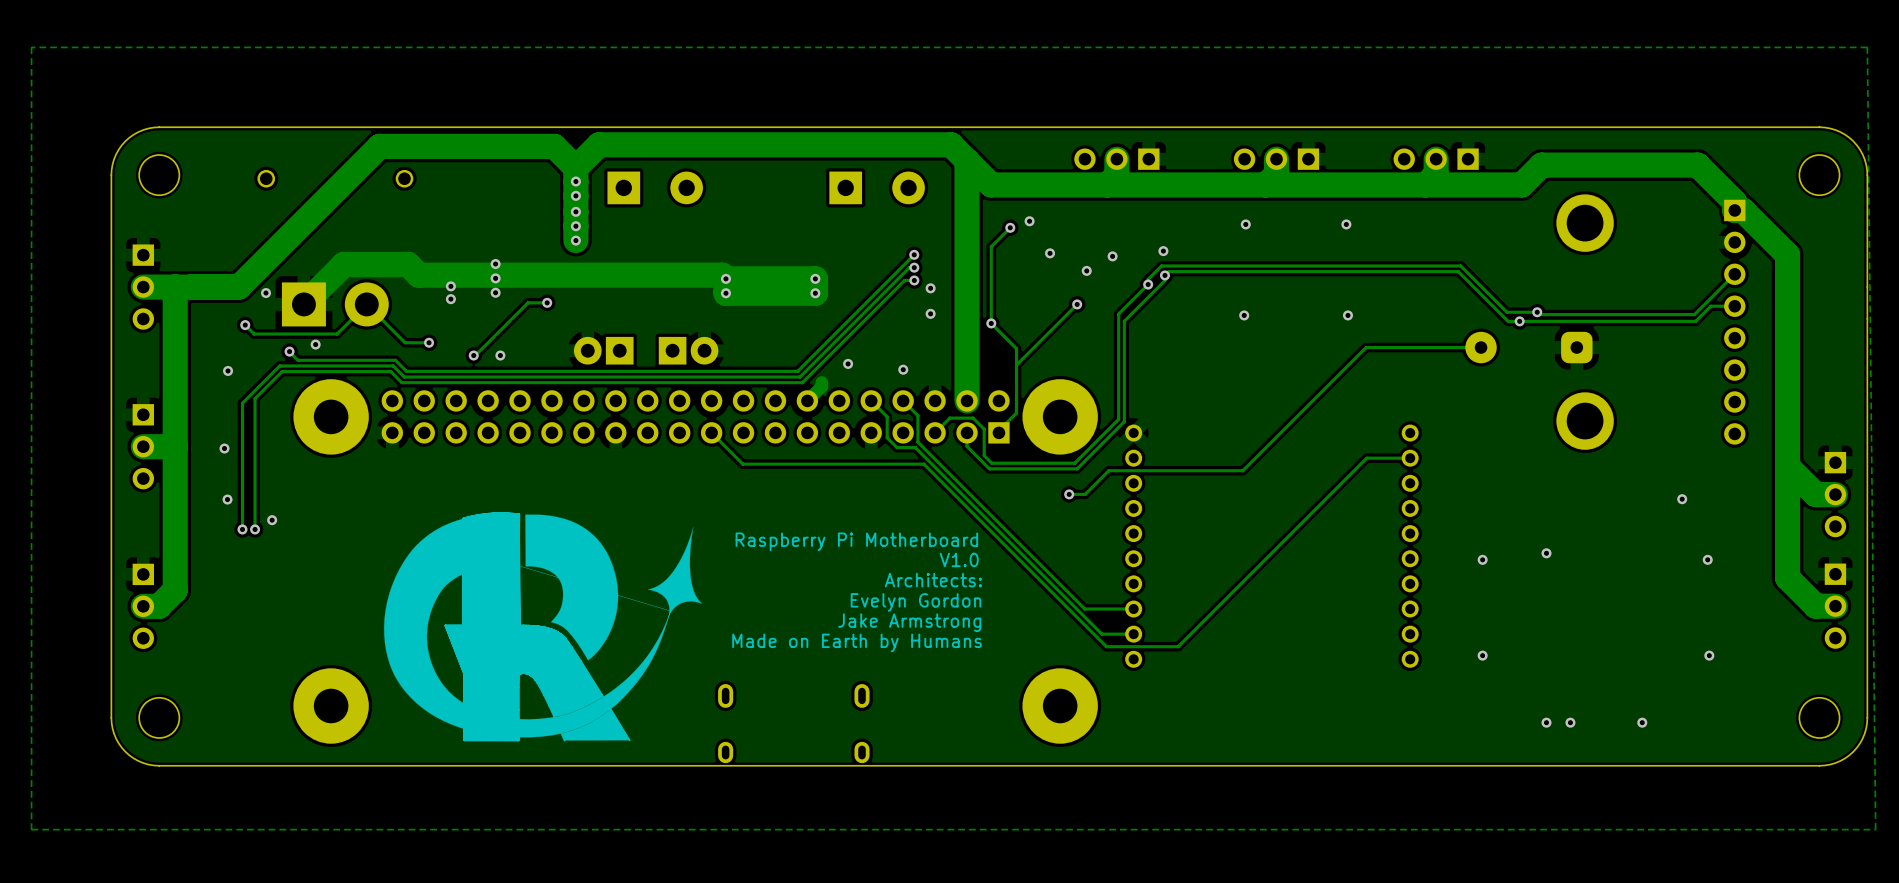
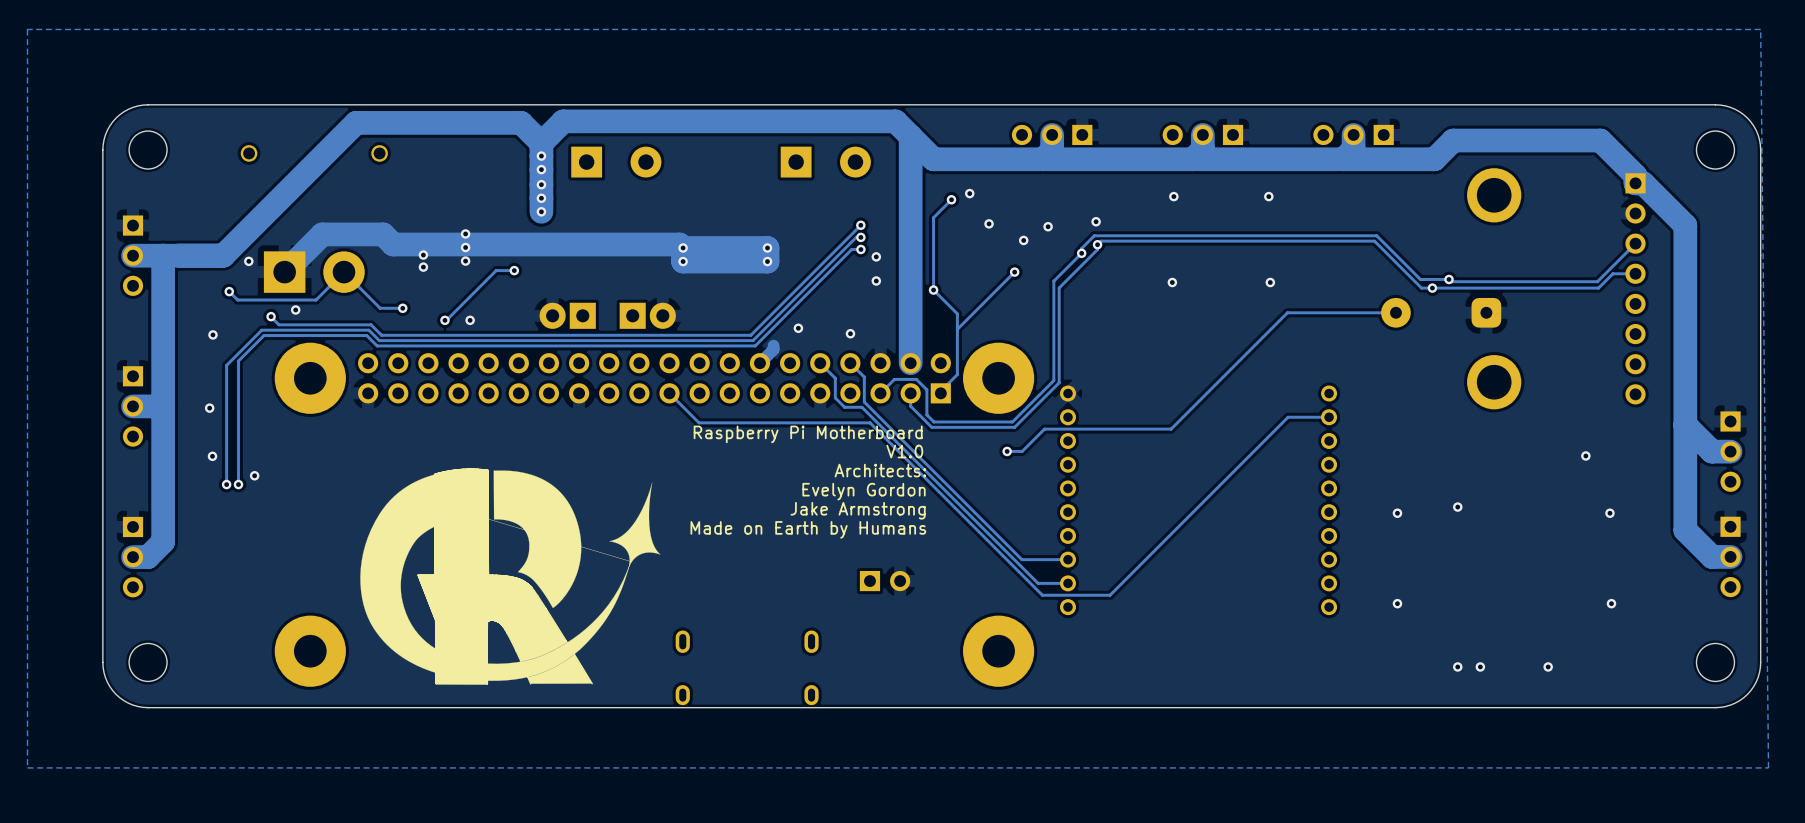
text: none -> Raspberry Pi Motherboard (808, 434)
text: none -> V1.0 (904, 451)
text: none -> Architects: (880, 470)
text: Raspberry Pi Motherboard (856, 541) -> Evelyn Gordon (864, 491)
text: V1.0 (959, 559) -> Jake Armstrong (858, 510)
text: Architects: (933, 580) -> Made on Earth by Humans (808, 529)
text: Evelyn Gordon (916, 602) -> none
text: Jake Armstrong (909, 622) -> none
part: none -> (885, 581)
text: Made on Earth by Humans (857, 642) -> none

